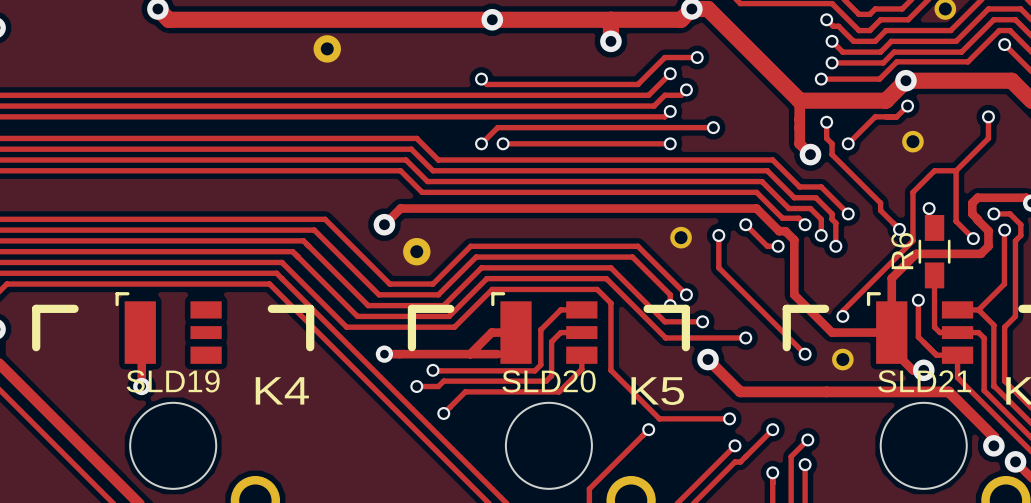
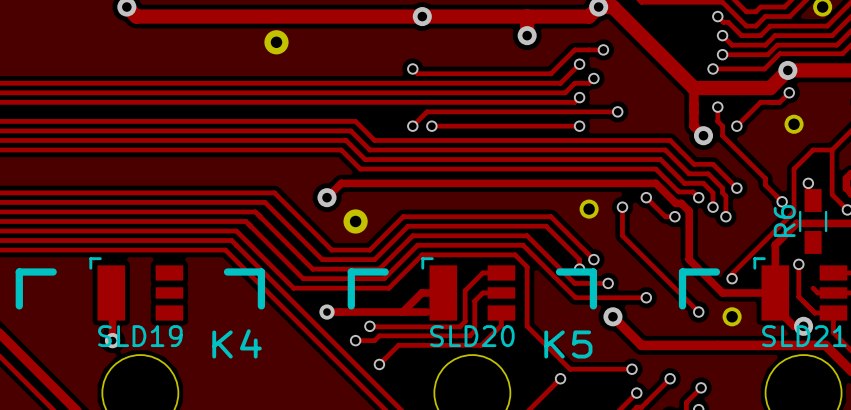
track: (934, 275) (934, 327) -> none

